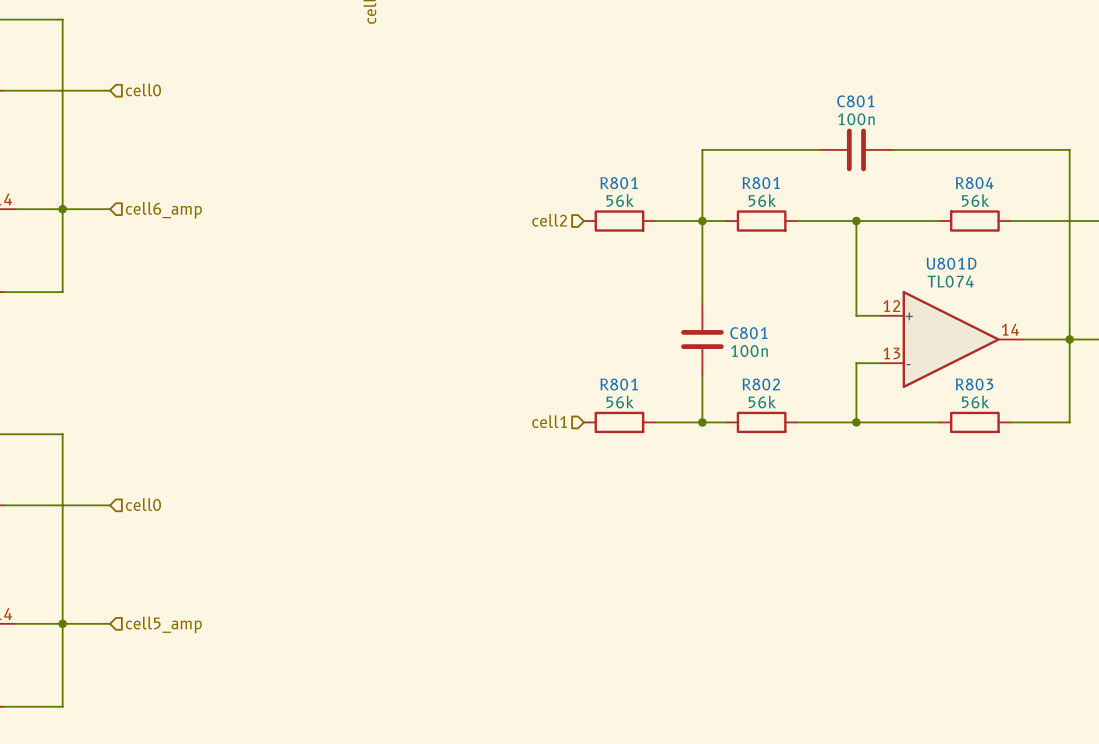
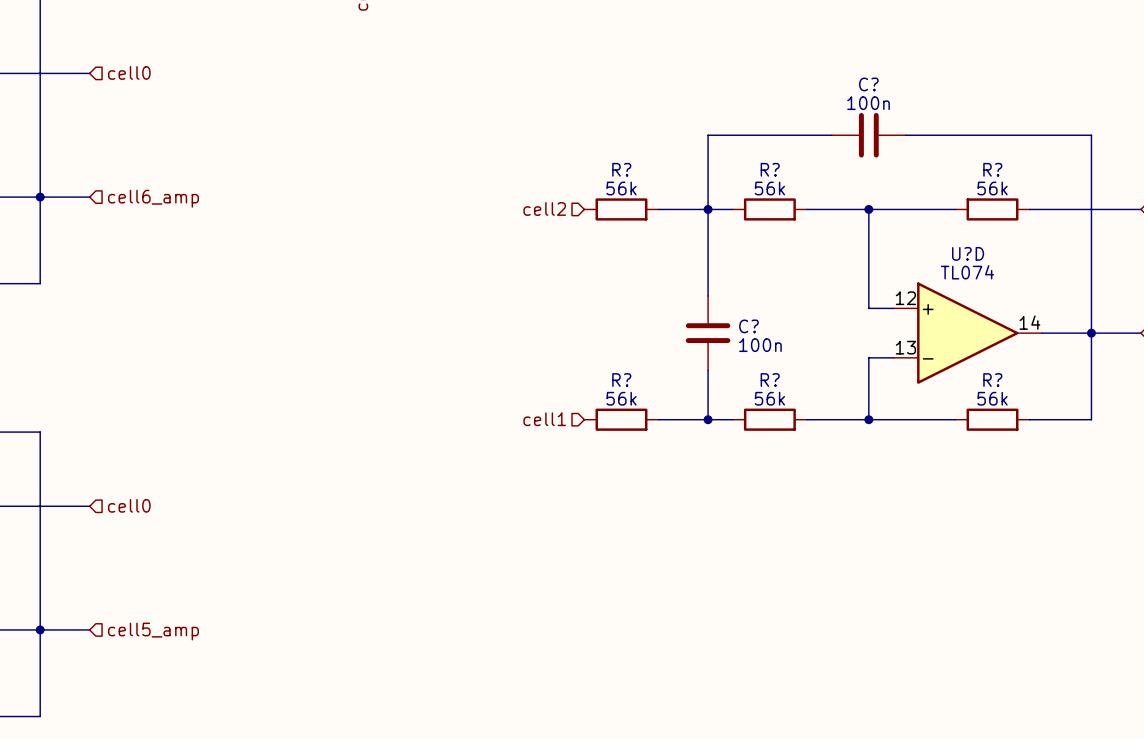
C801 name: C801 (855, 101) -> C? (868, 84)
R801 name: R801 (619, 183) -> R? (621, 169)
R801 name: R801 (761, 183) -> R? (770, 169)
R804 name: R804 (974, 183) -> R? (992, 169)
U801D name: U801D (951, 263) -> U?D (968, 253)
C801 name: C801 (748, 333) -> C? (748, 326)
R801 name: R801 (619, 384) -> R? (621, 380)
R802 name: R802 (761, 384) -> R? (770, 380)
R803 name: R803 (974, 384) -> R? (992, 380)

